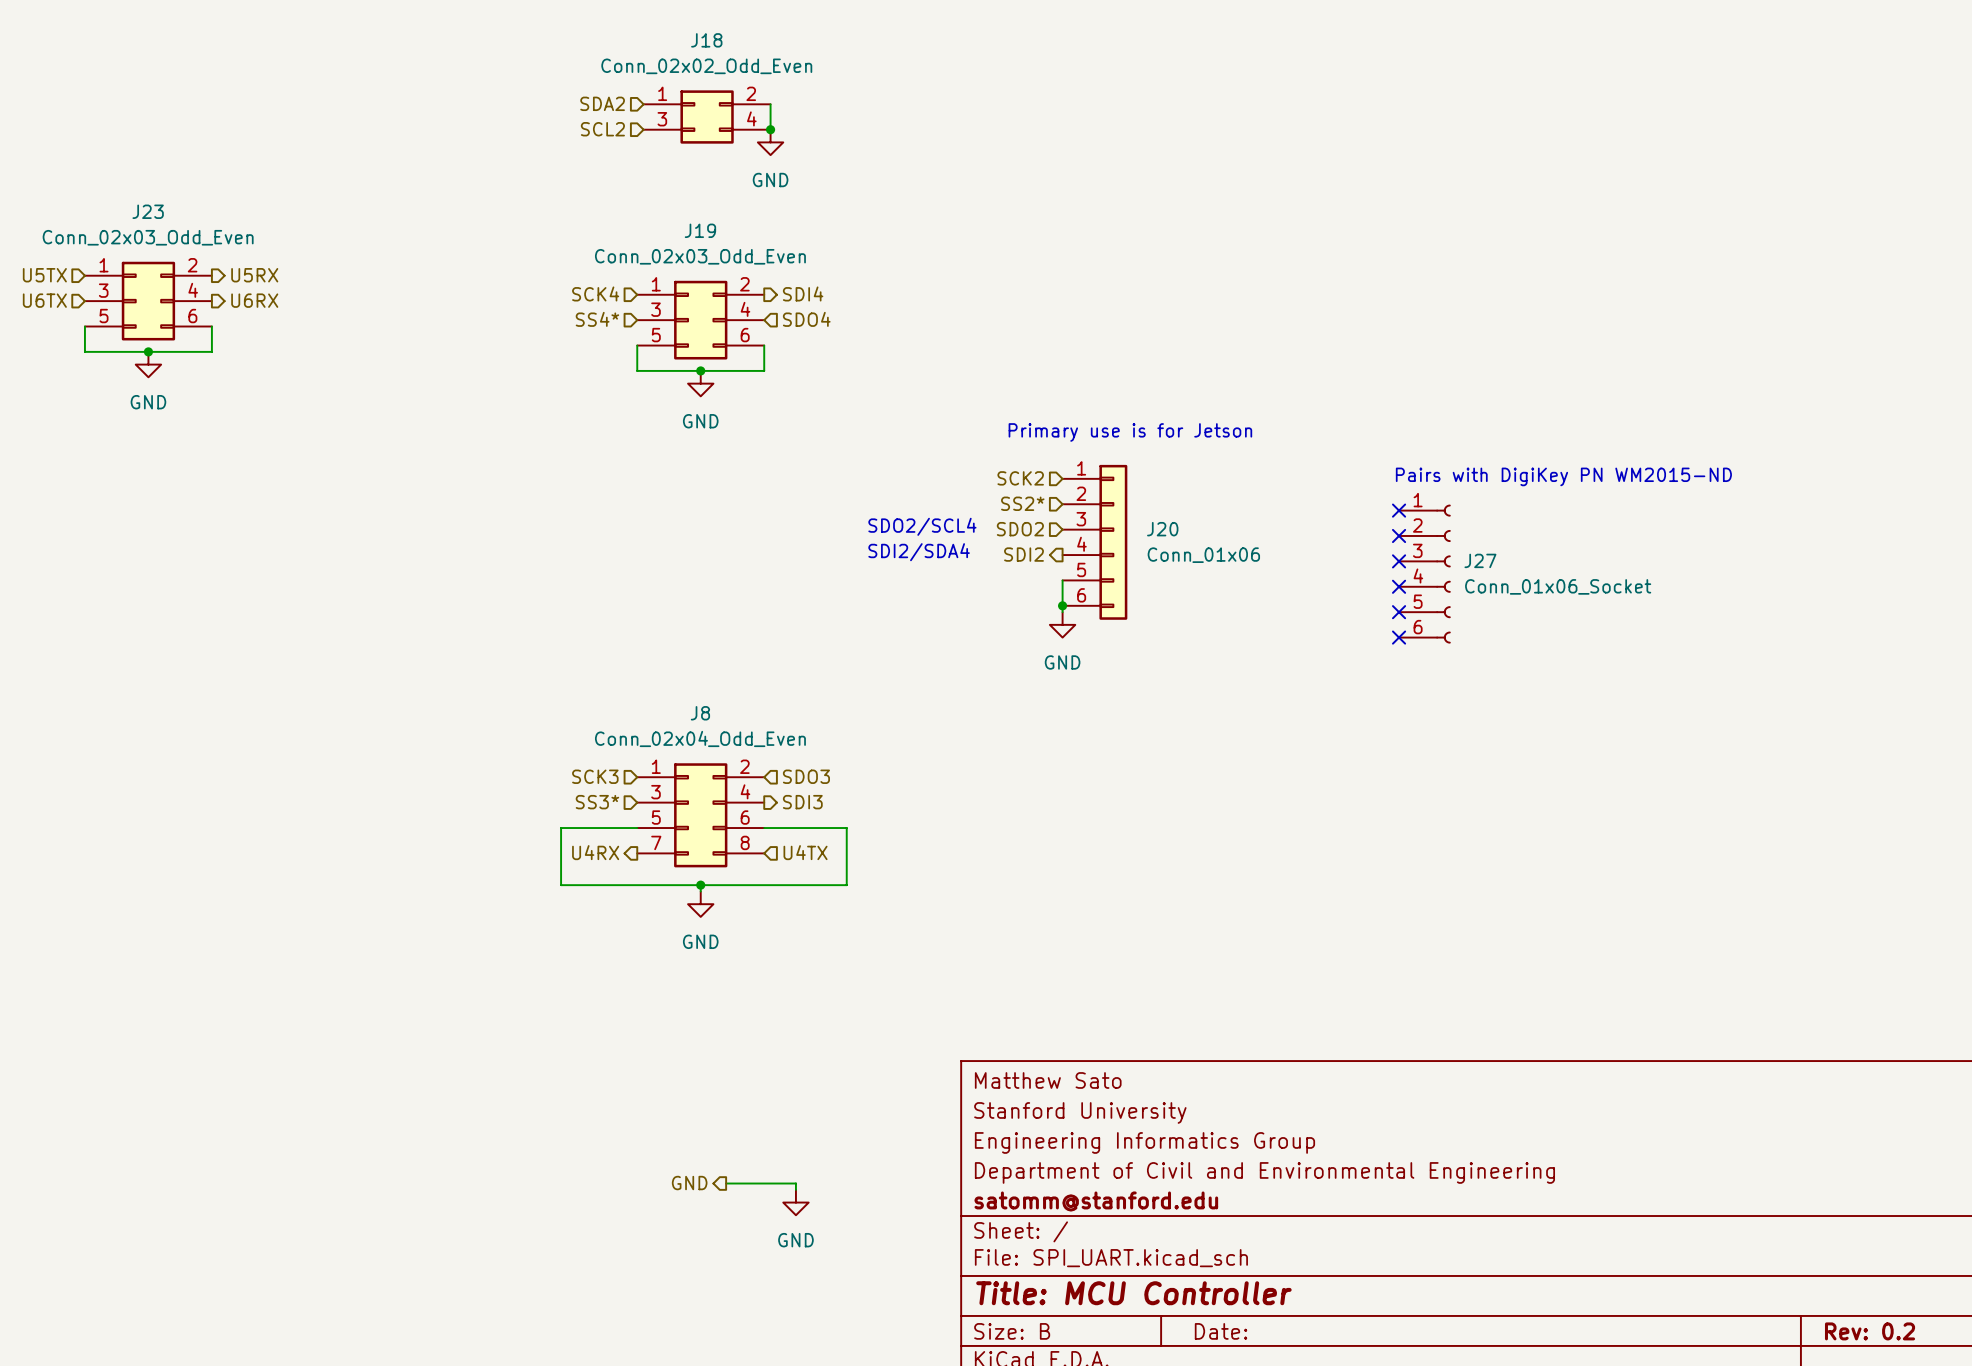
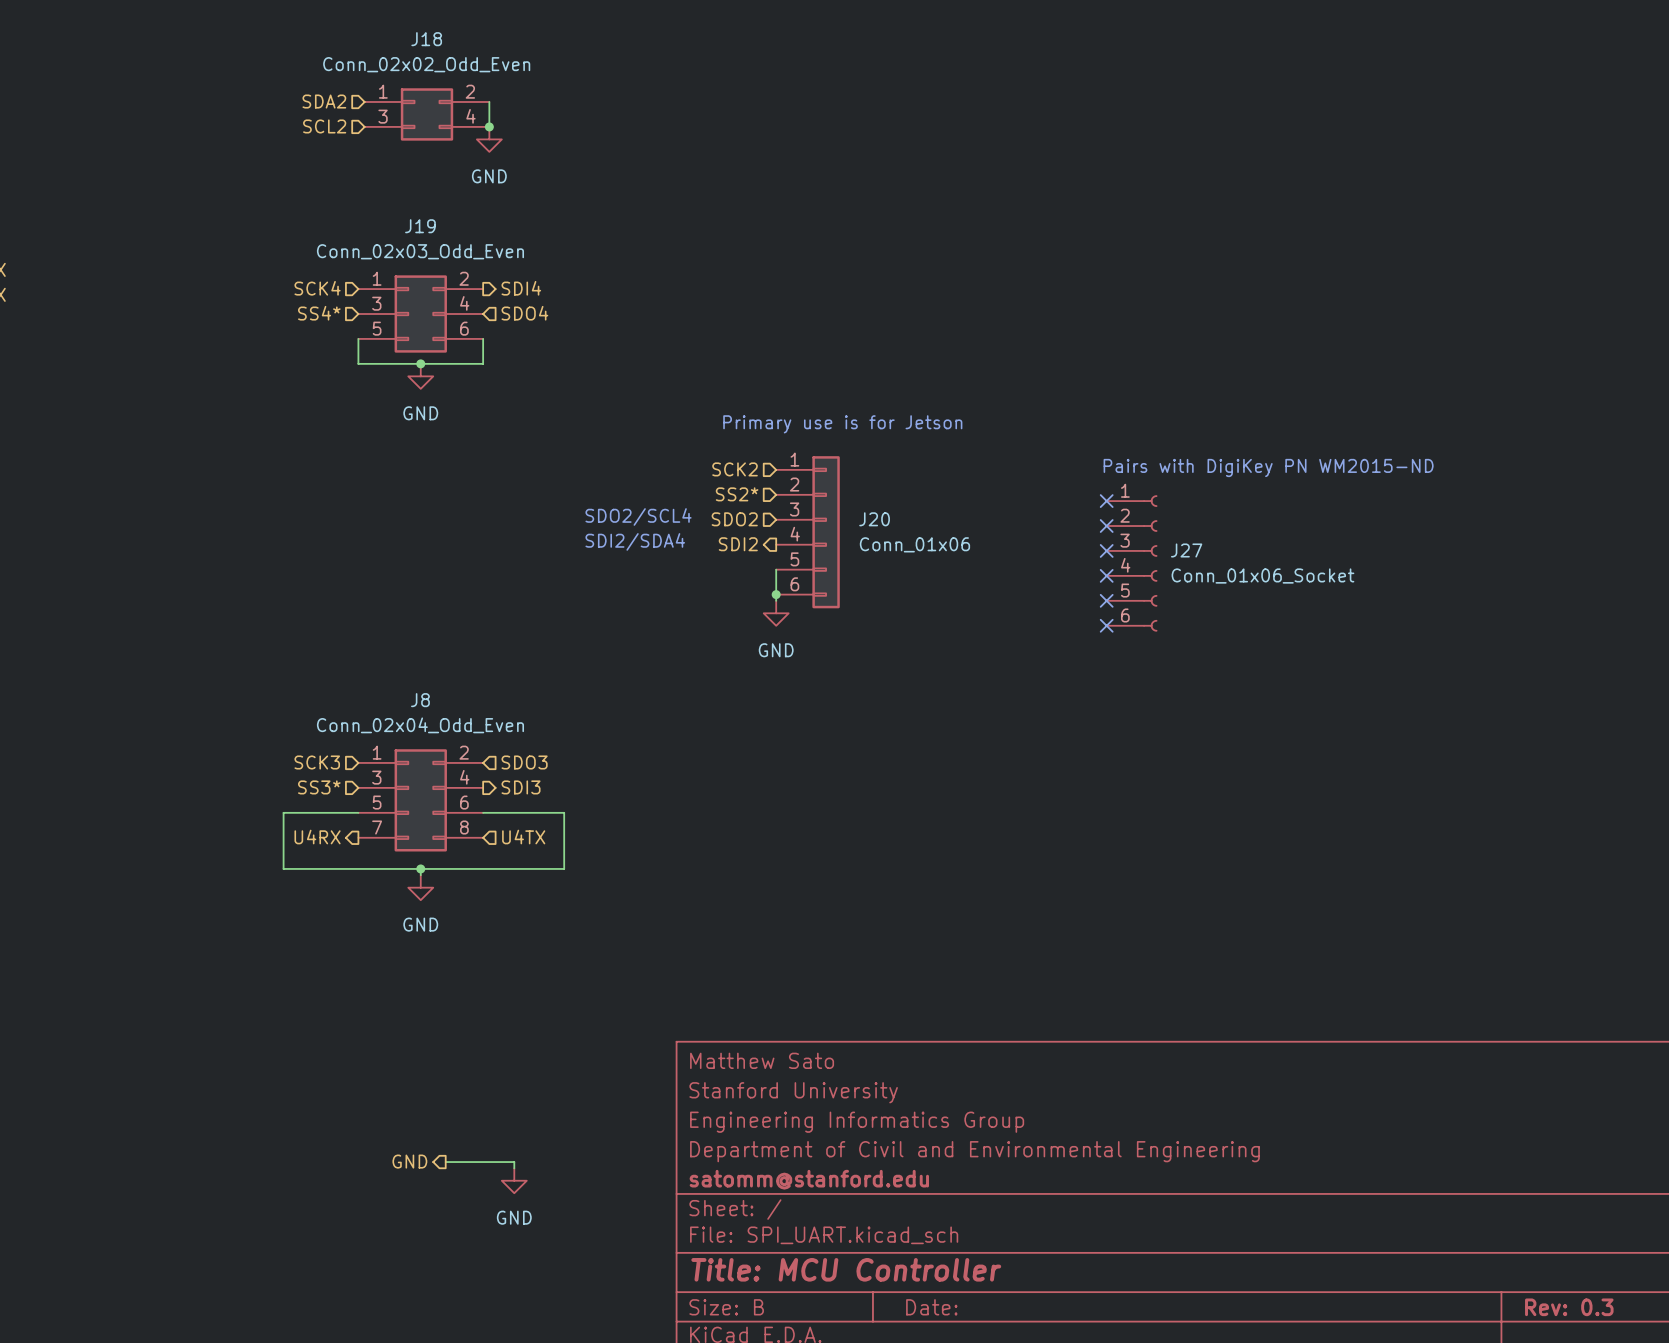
title block: Rev: 0.2 (1870, 1331) -> Rev: 0.3 (1569, 1307)

